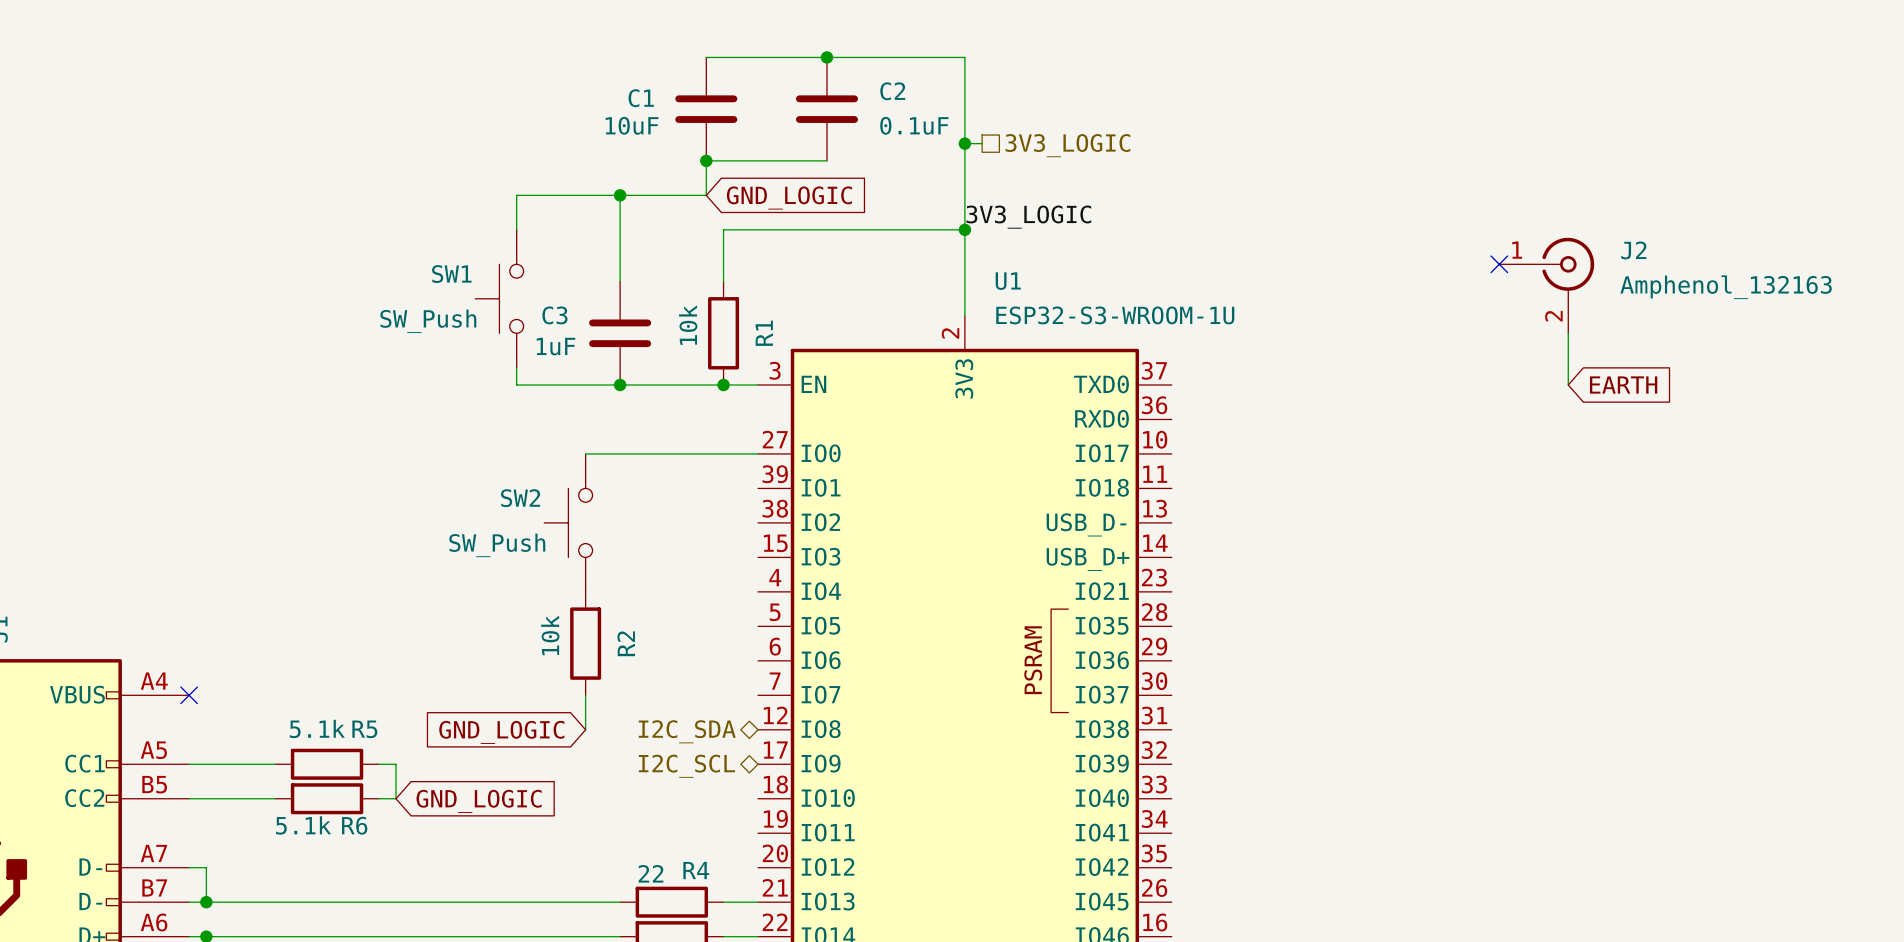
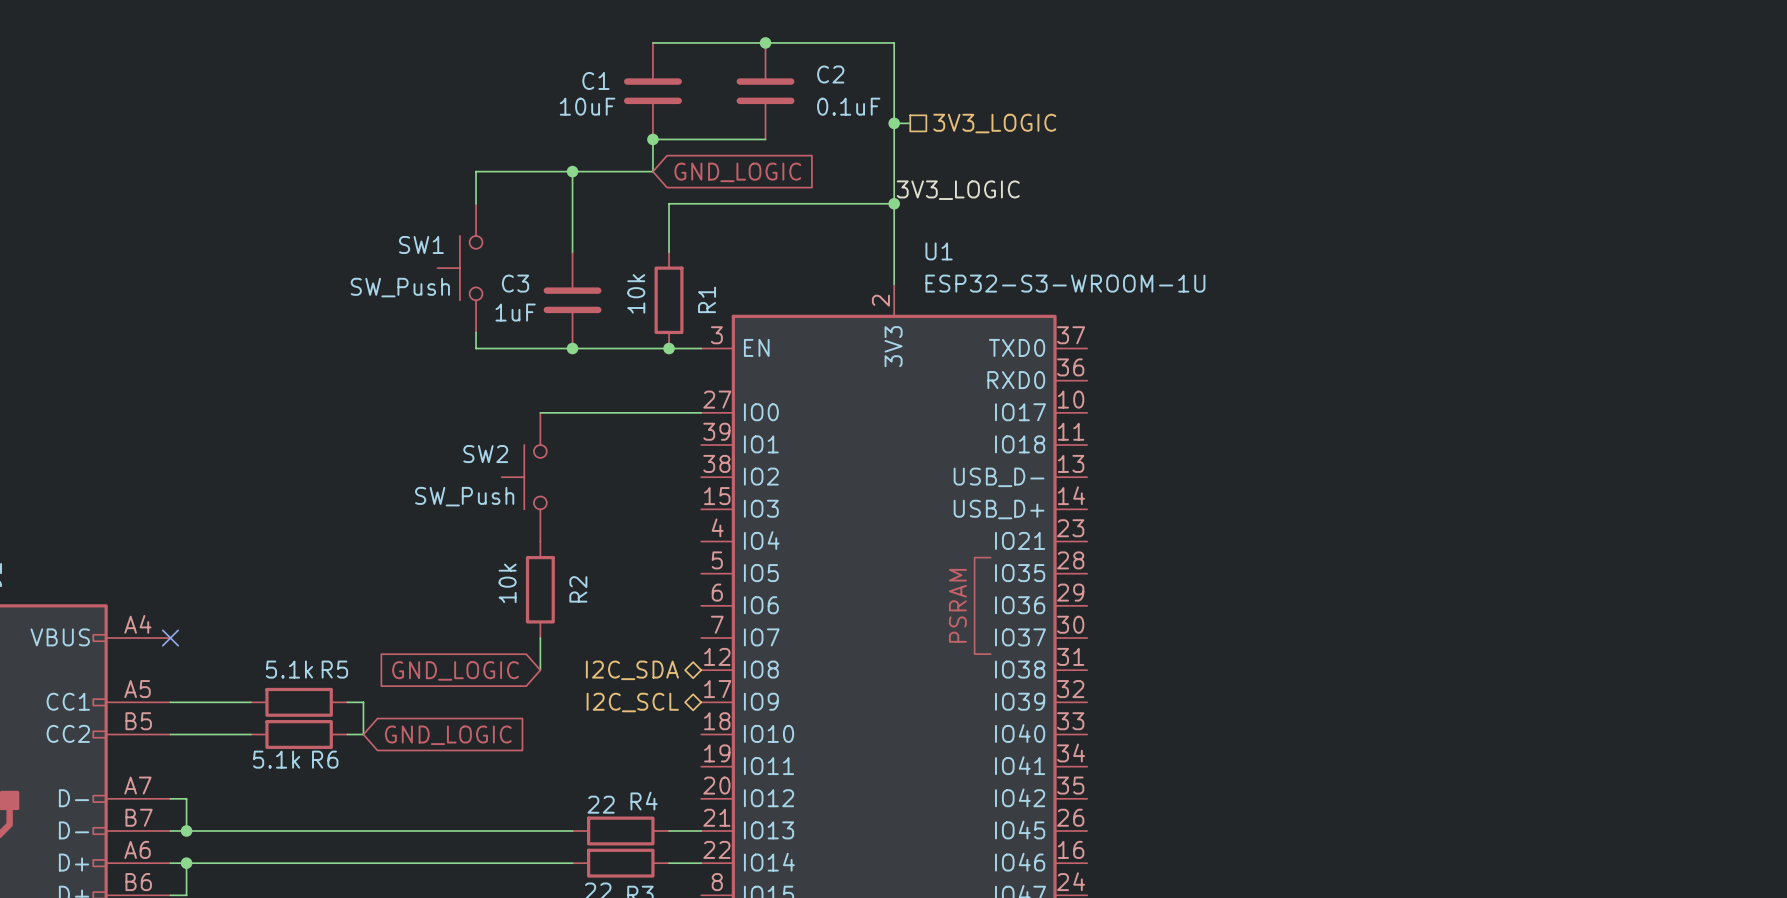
no-connect mark: (1499, 264) -> none
J2: Amphenol_132163 (1546, 285) -> none
wire: (1568, 333) (1568, 385) -> none
global label: EARTH (1623, 385) -> none

